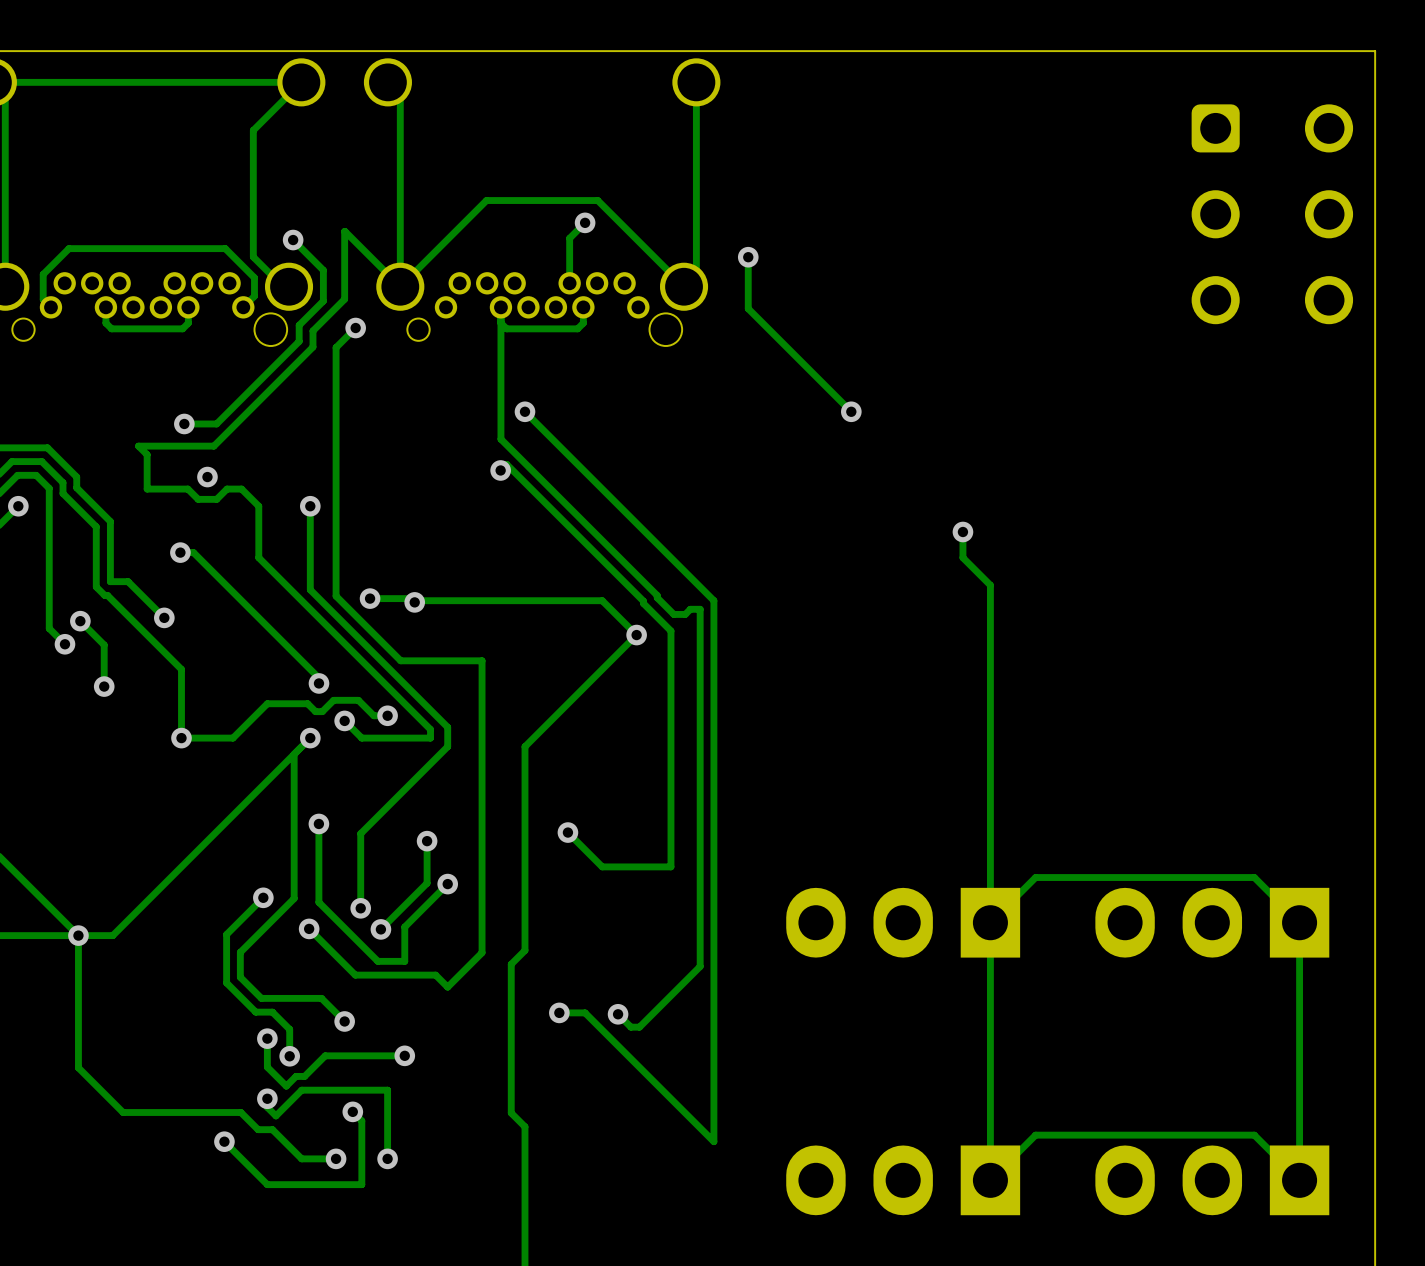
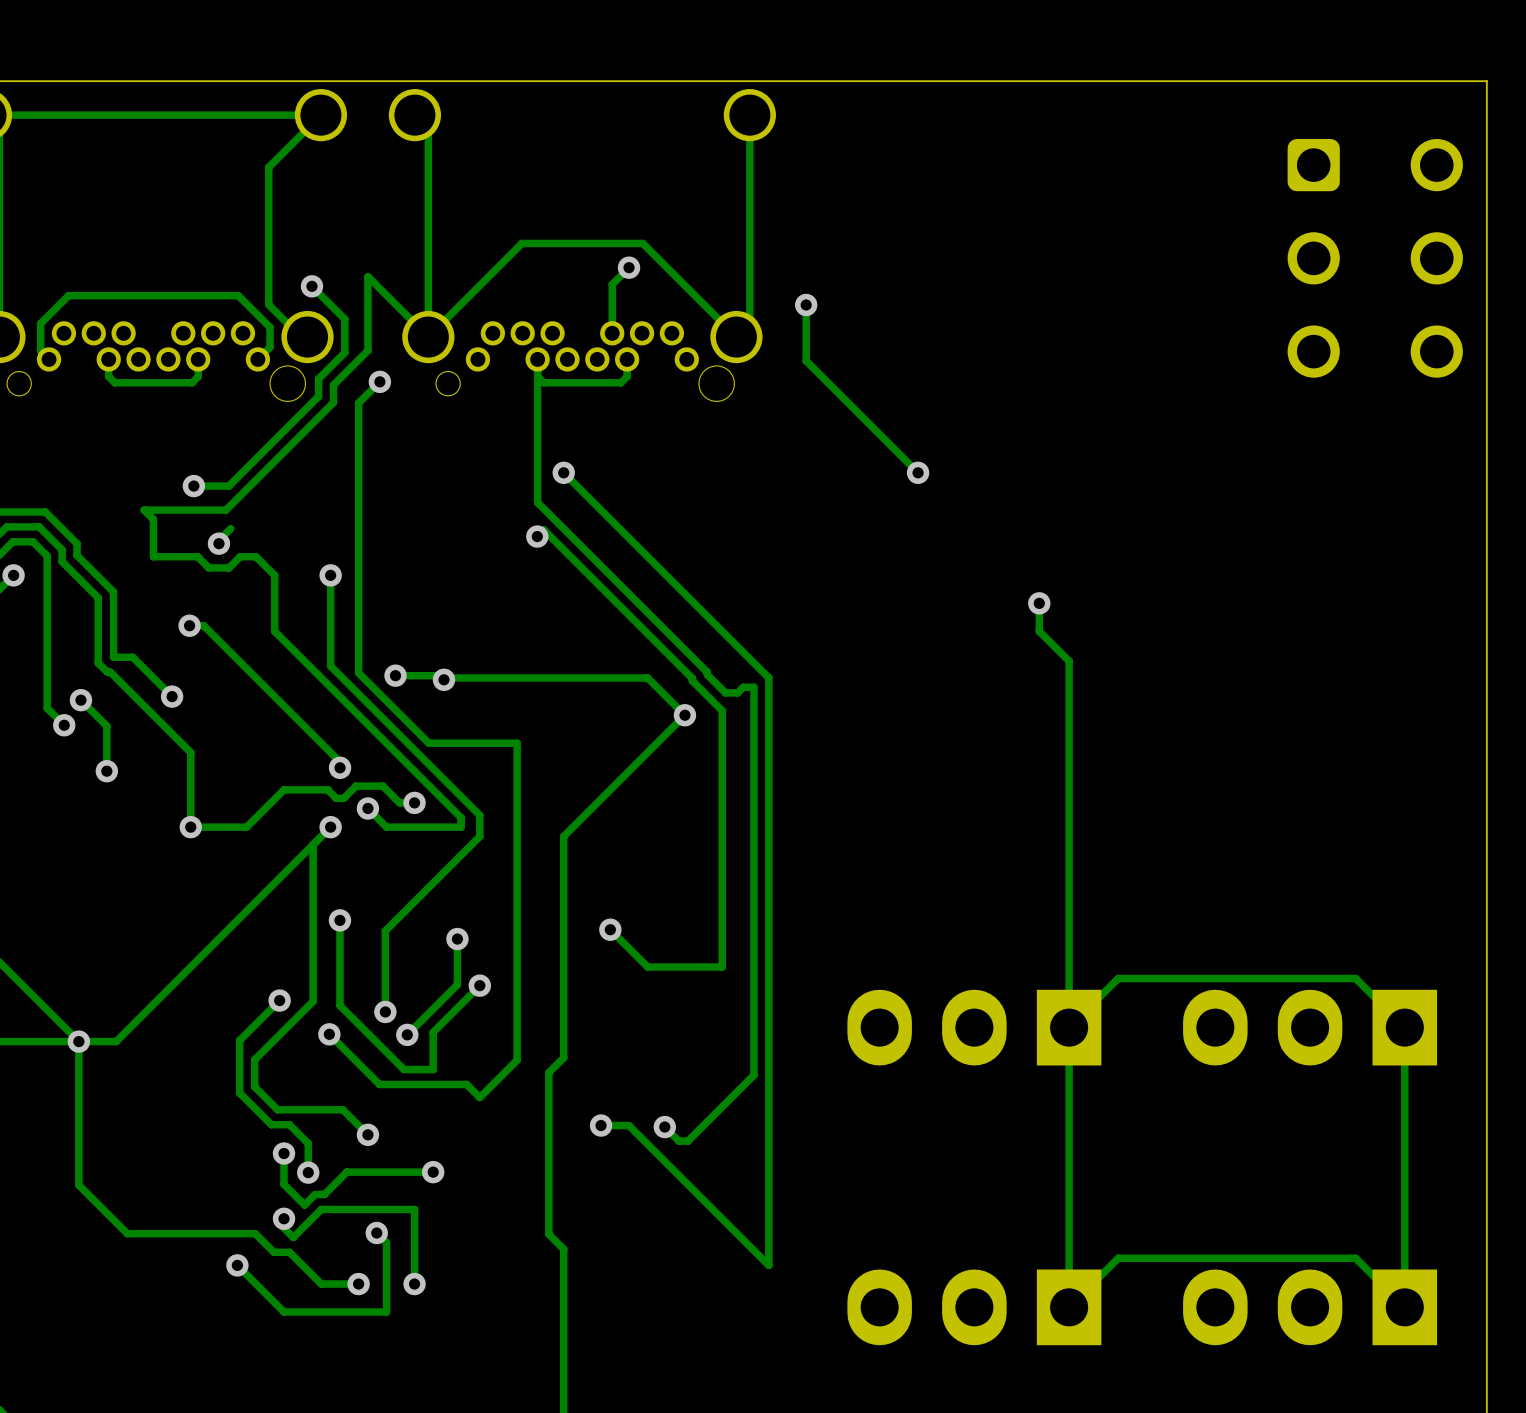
track: none -> (230, 528) (218, 540)

